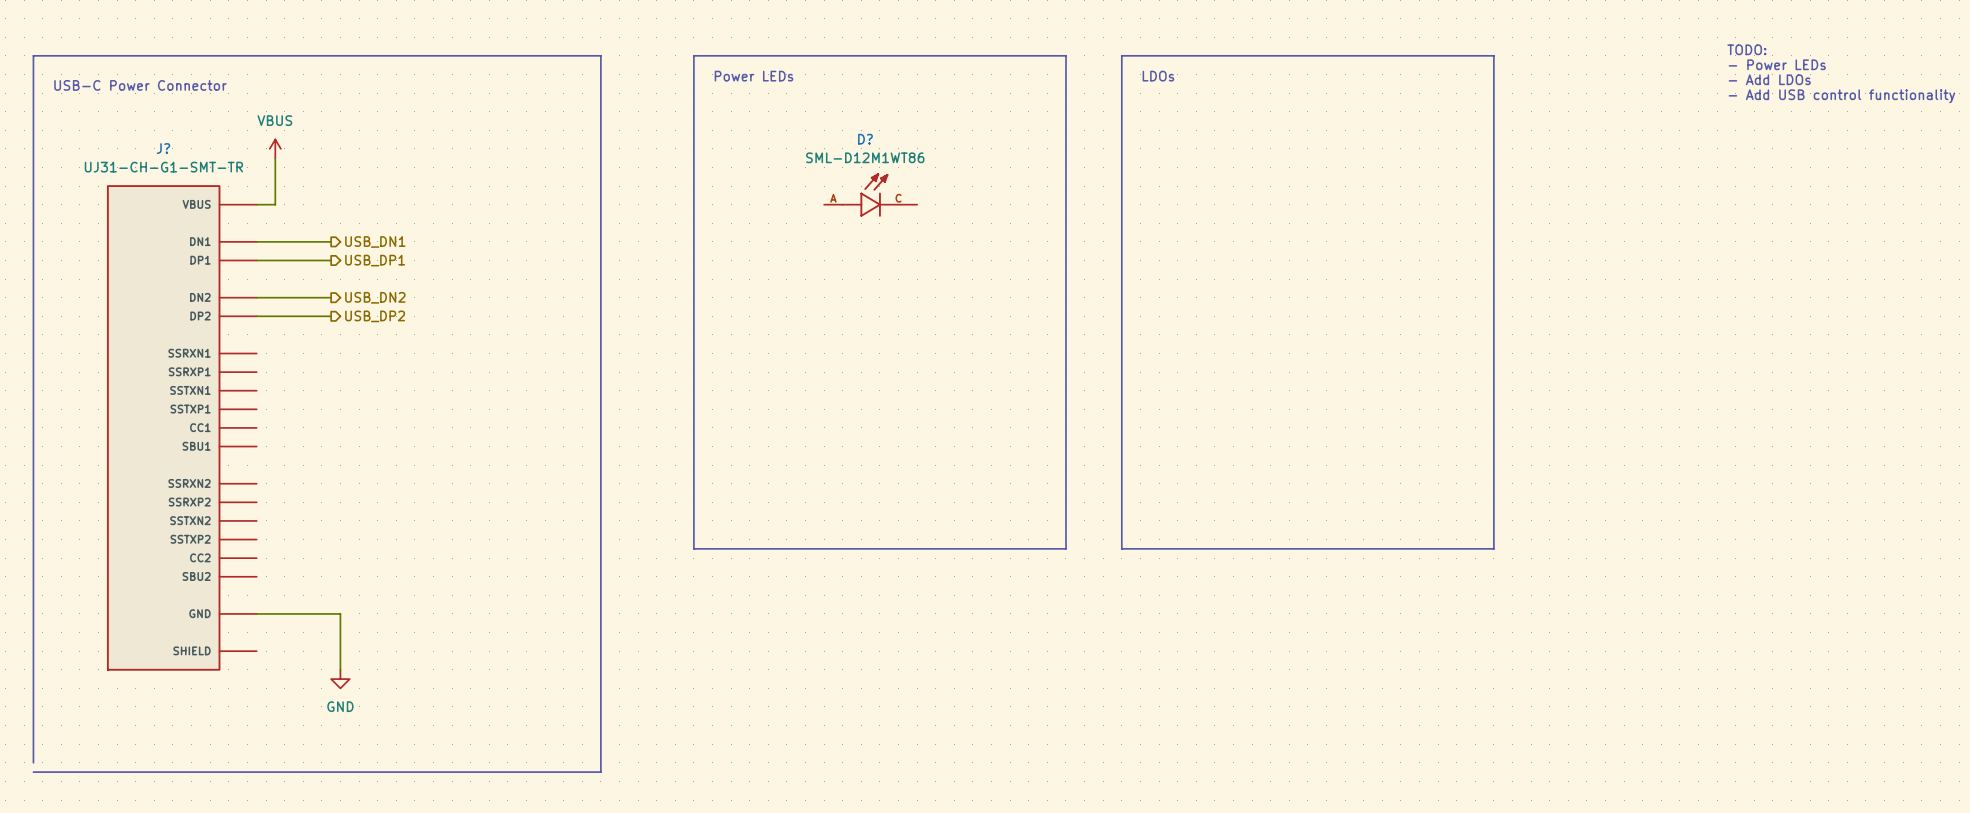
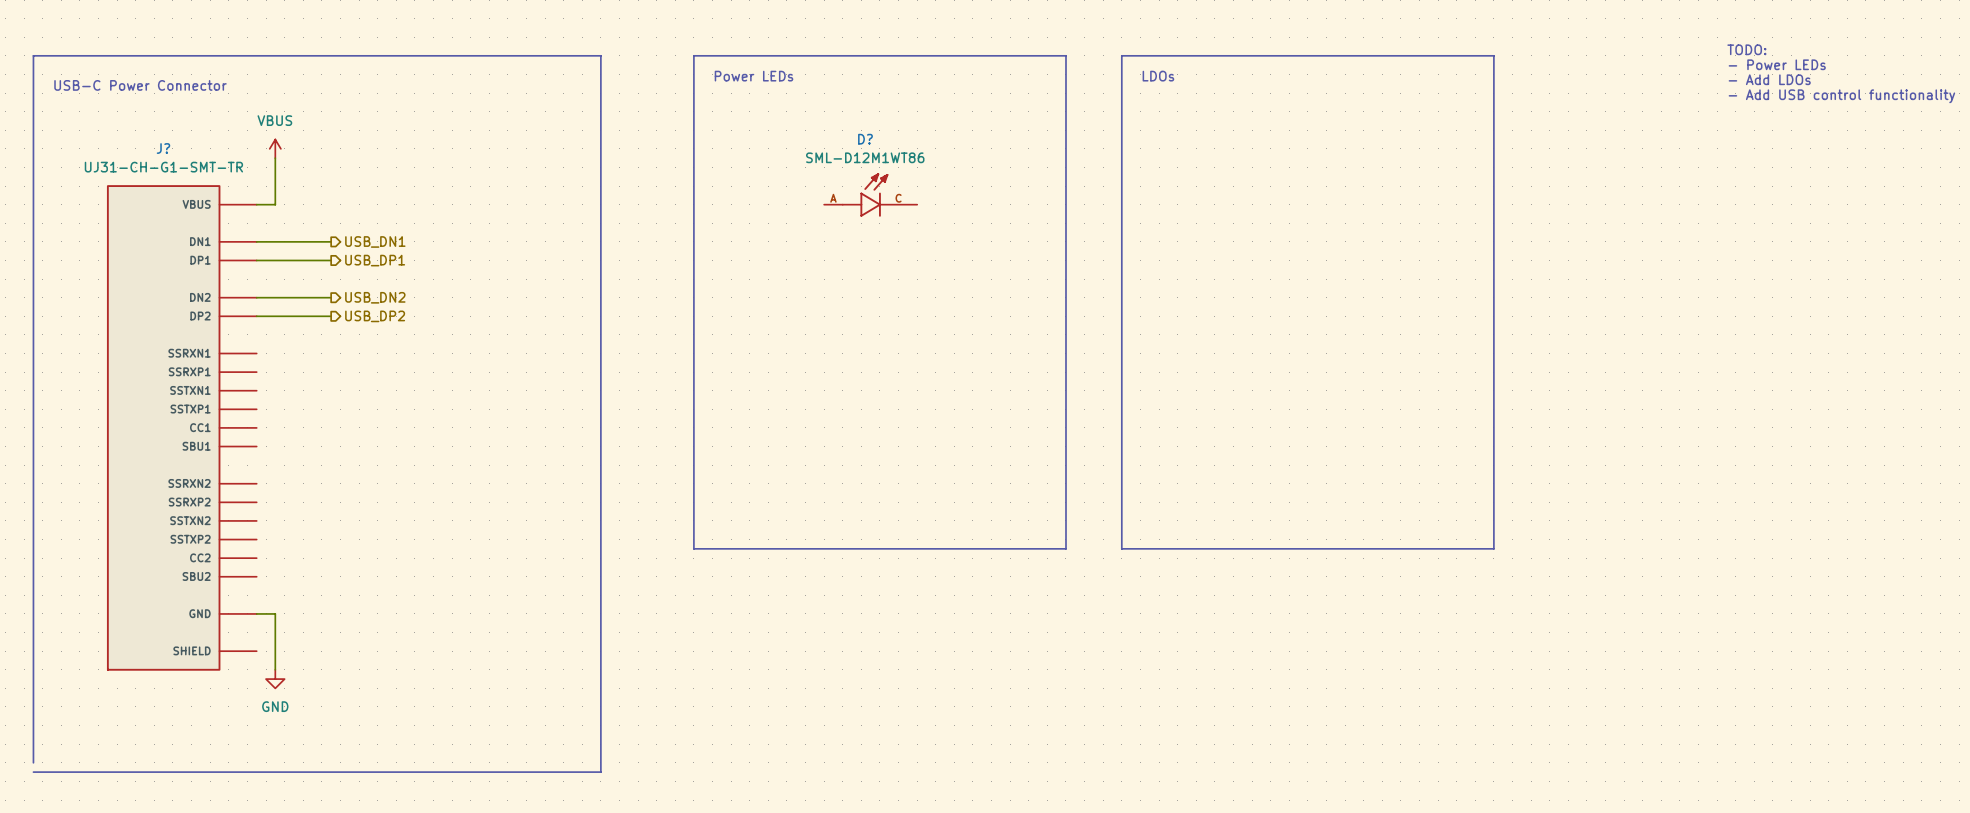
wire: (275, 613) (340, 613) (340, 669) -> (275, 613) (275, 669)
power symbol position: GND (340, 679) -> GND (275, 679)

